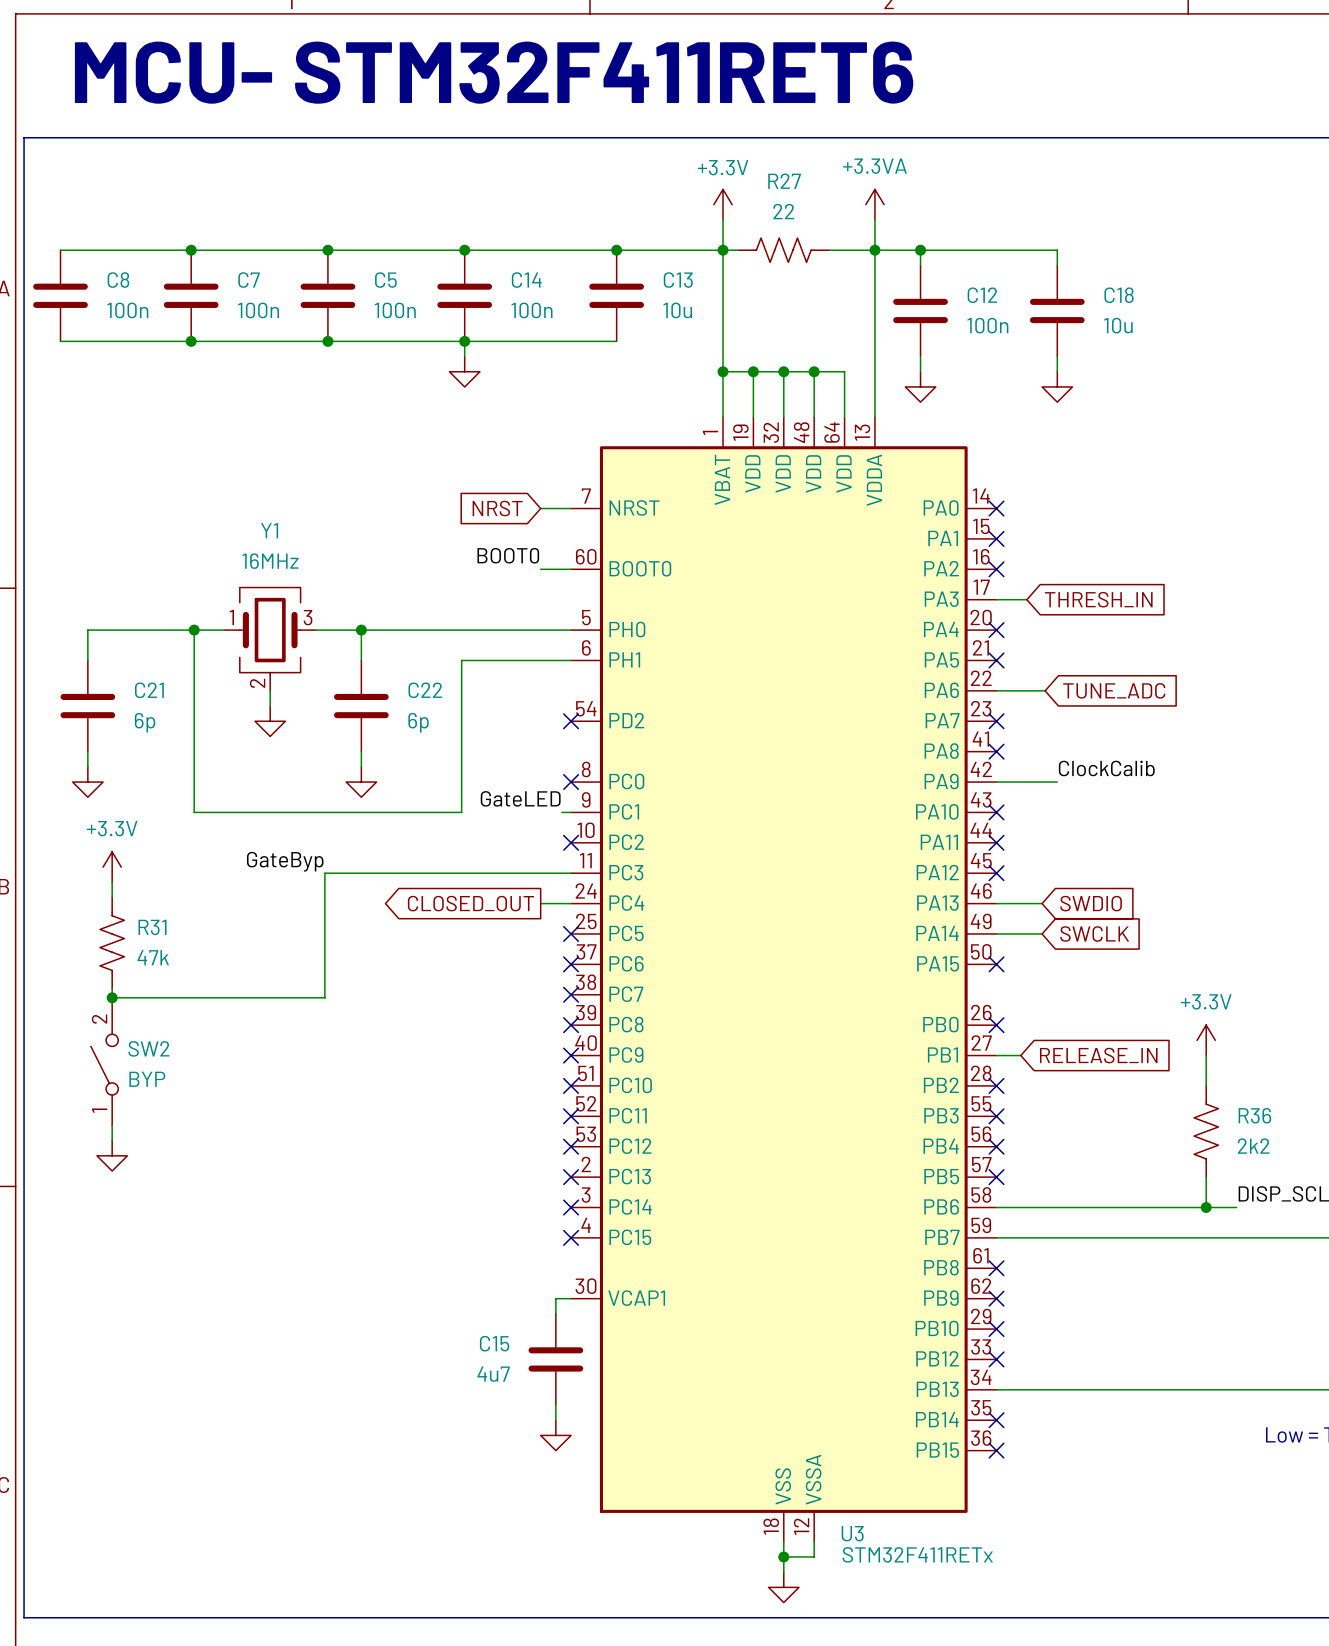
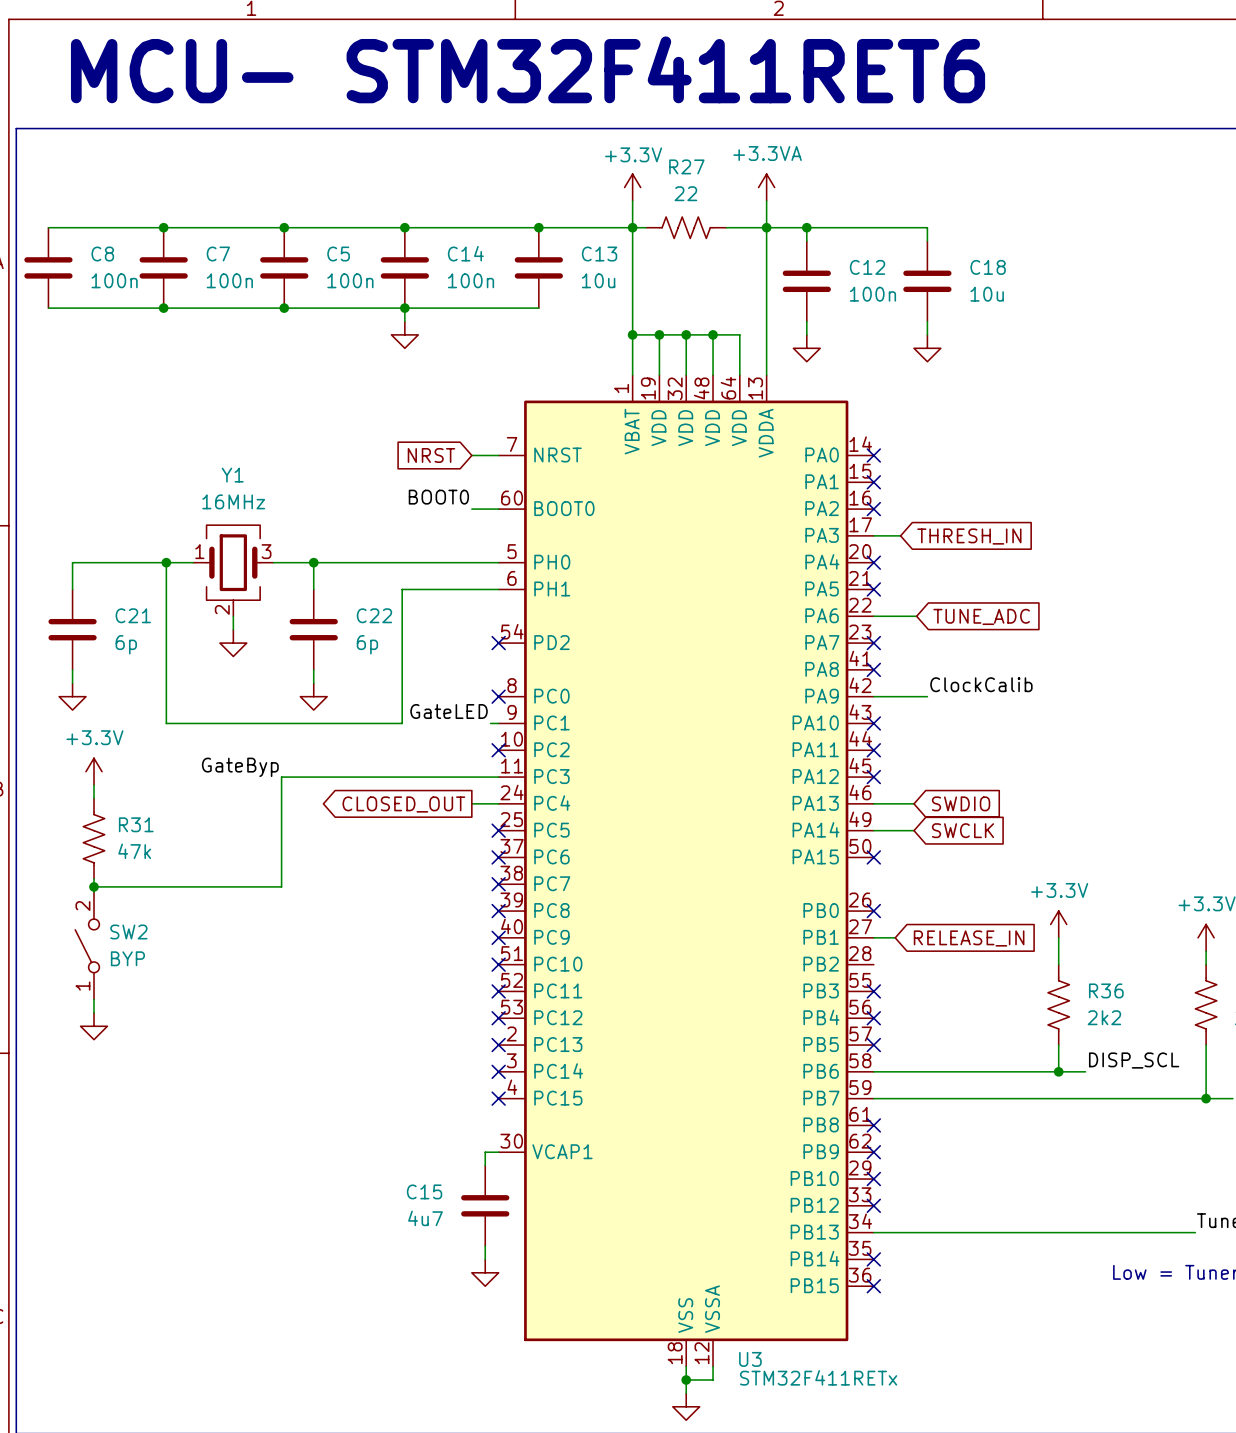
no-connect mark: (996, 1085) -> none

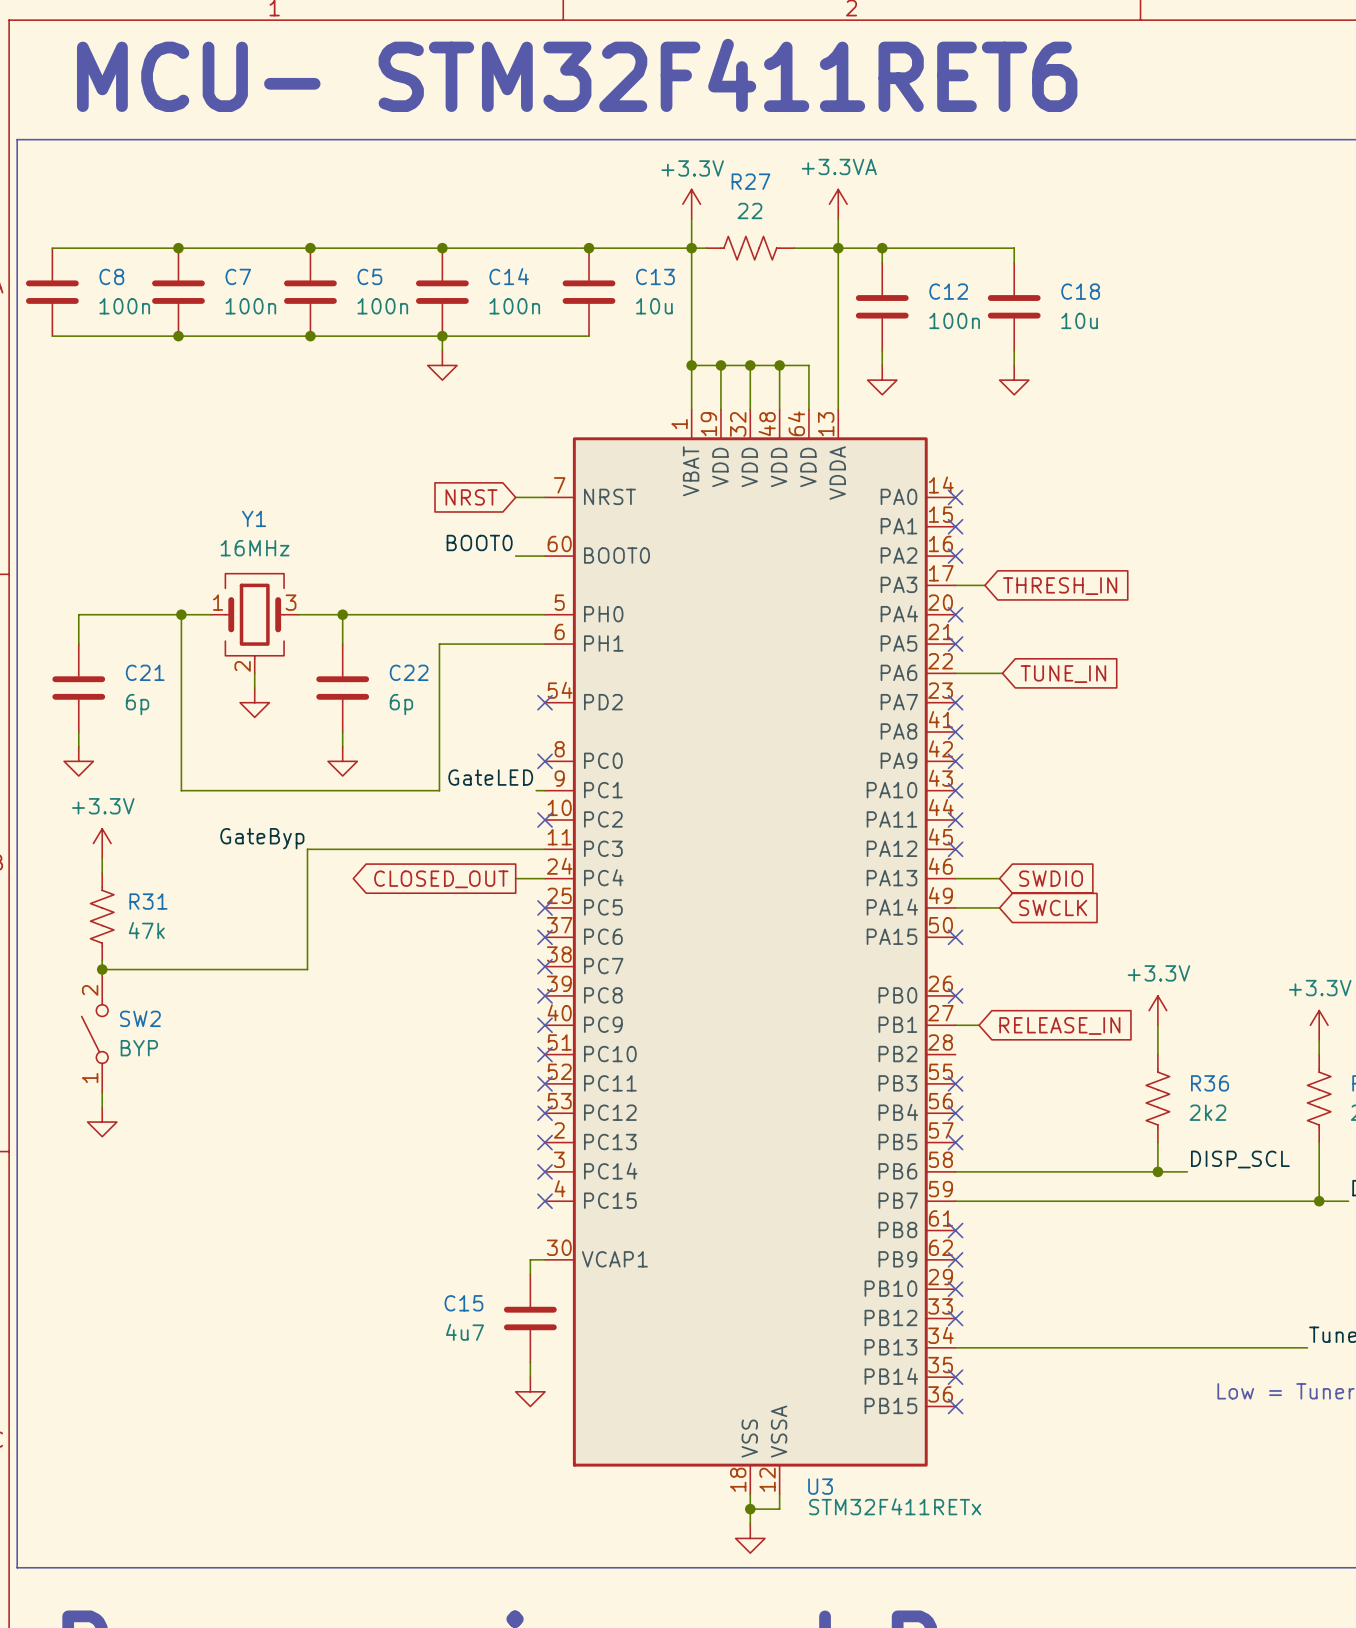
global label: TUNE_ADC (981, 616) -> TUNE_IN (1063, 674)
label: ClockCalib (981, 684) -> none
wire: (873, 696) (927, 696) -> none
no-connect mark: none -> (955, 761)

